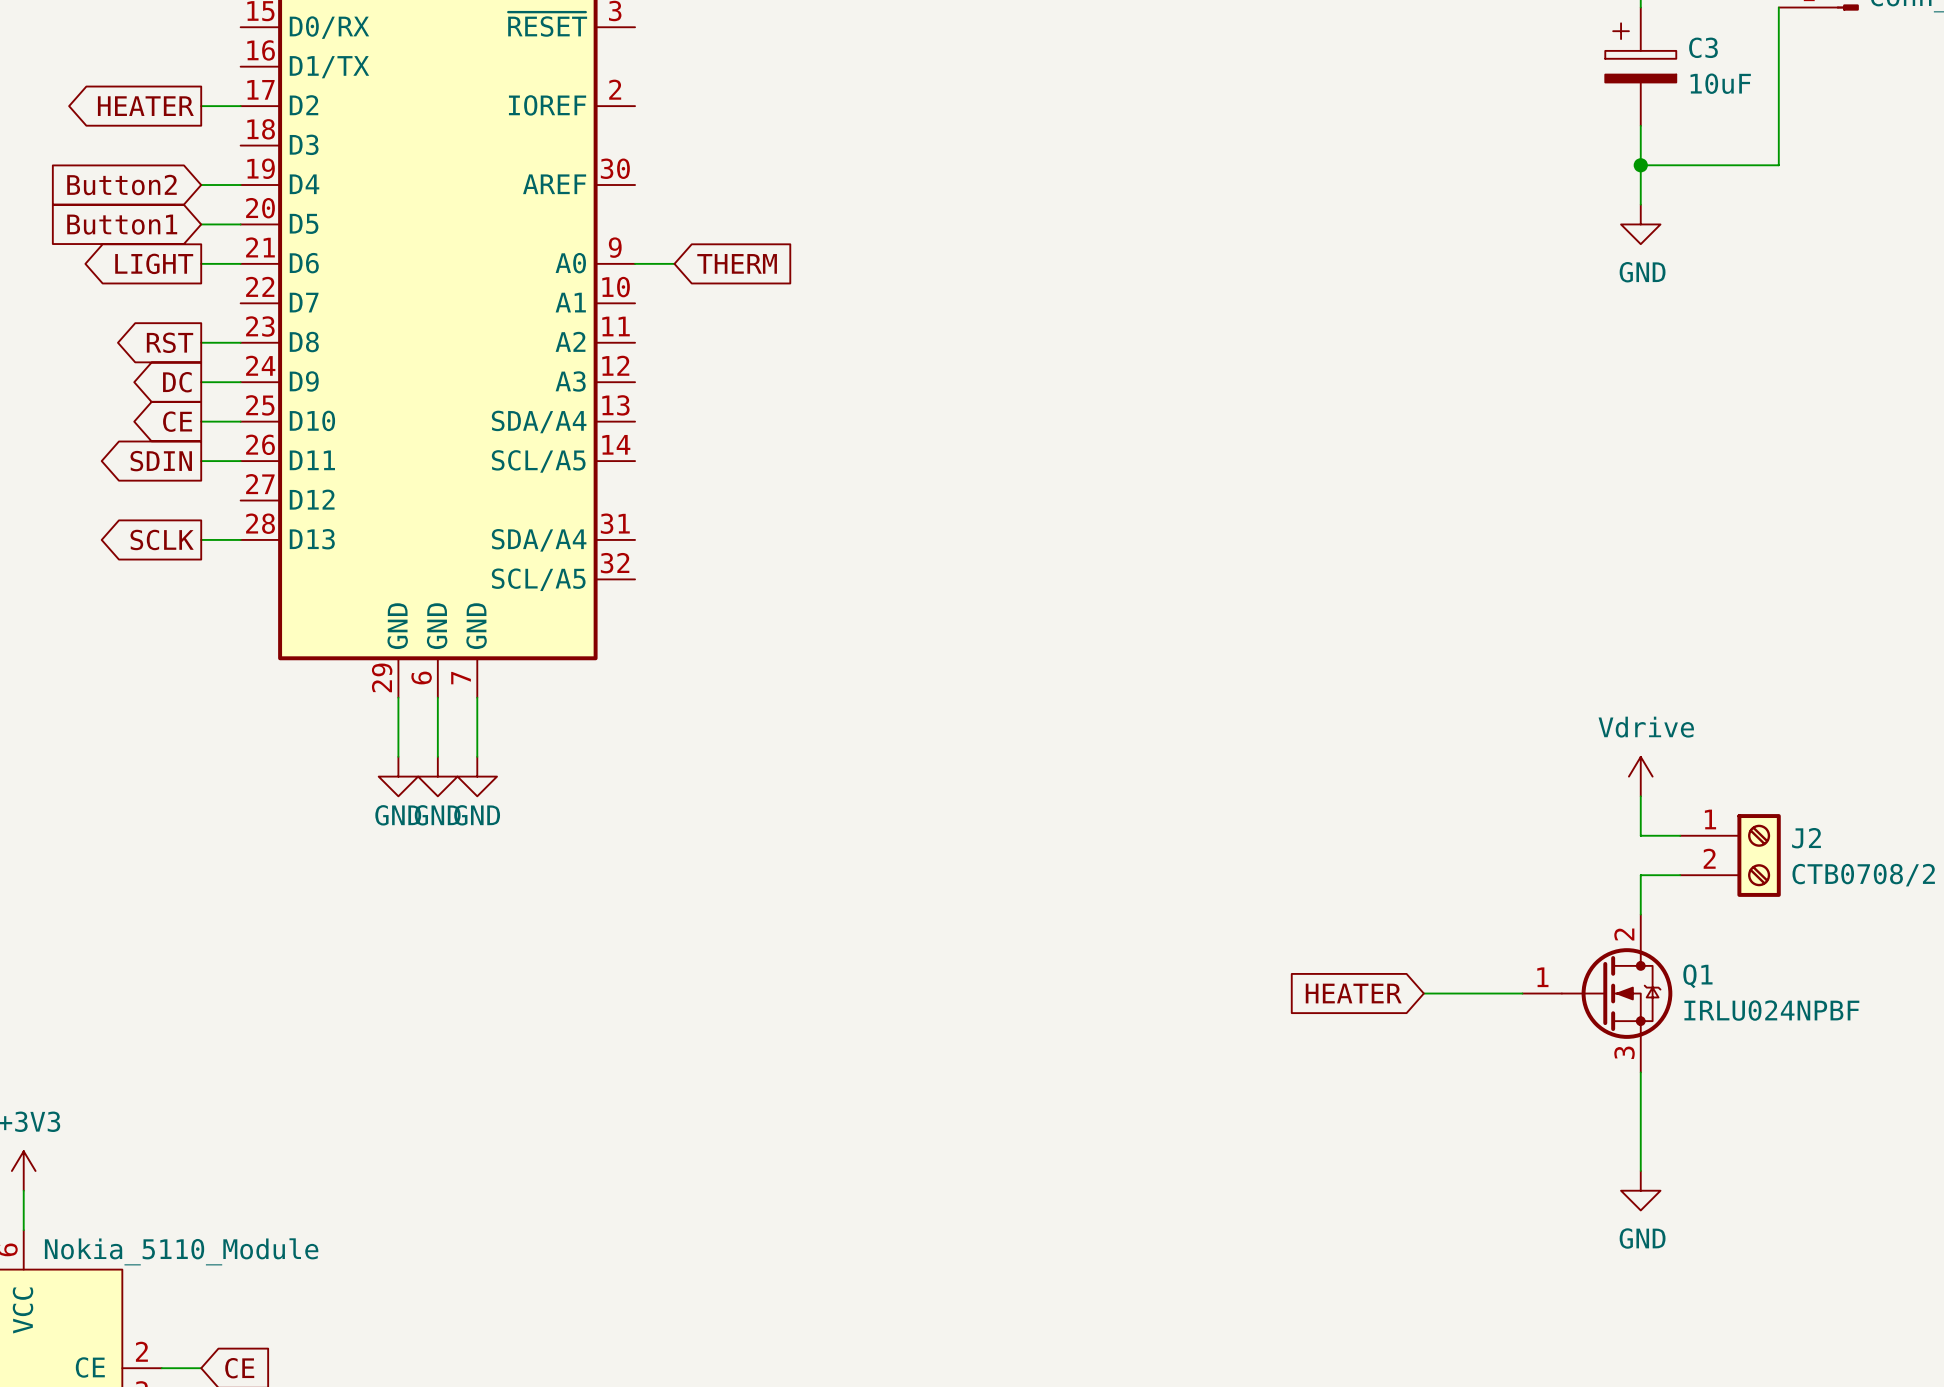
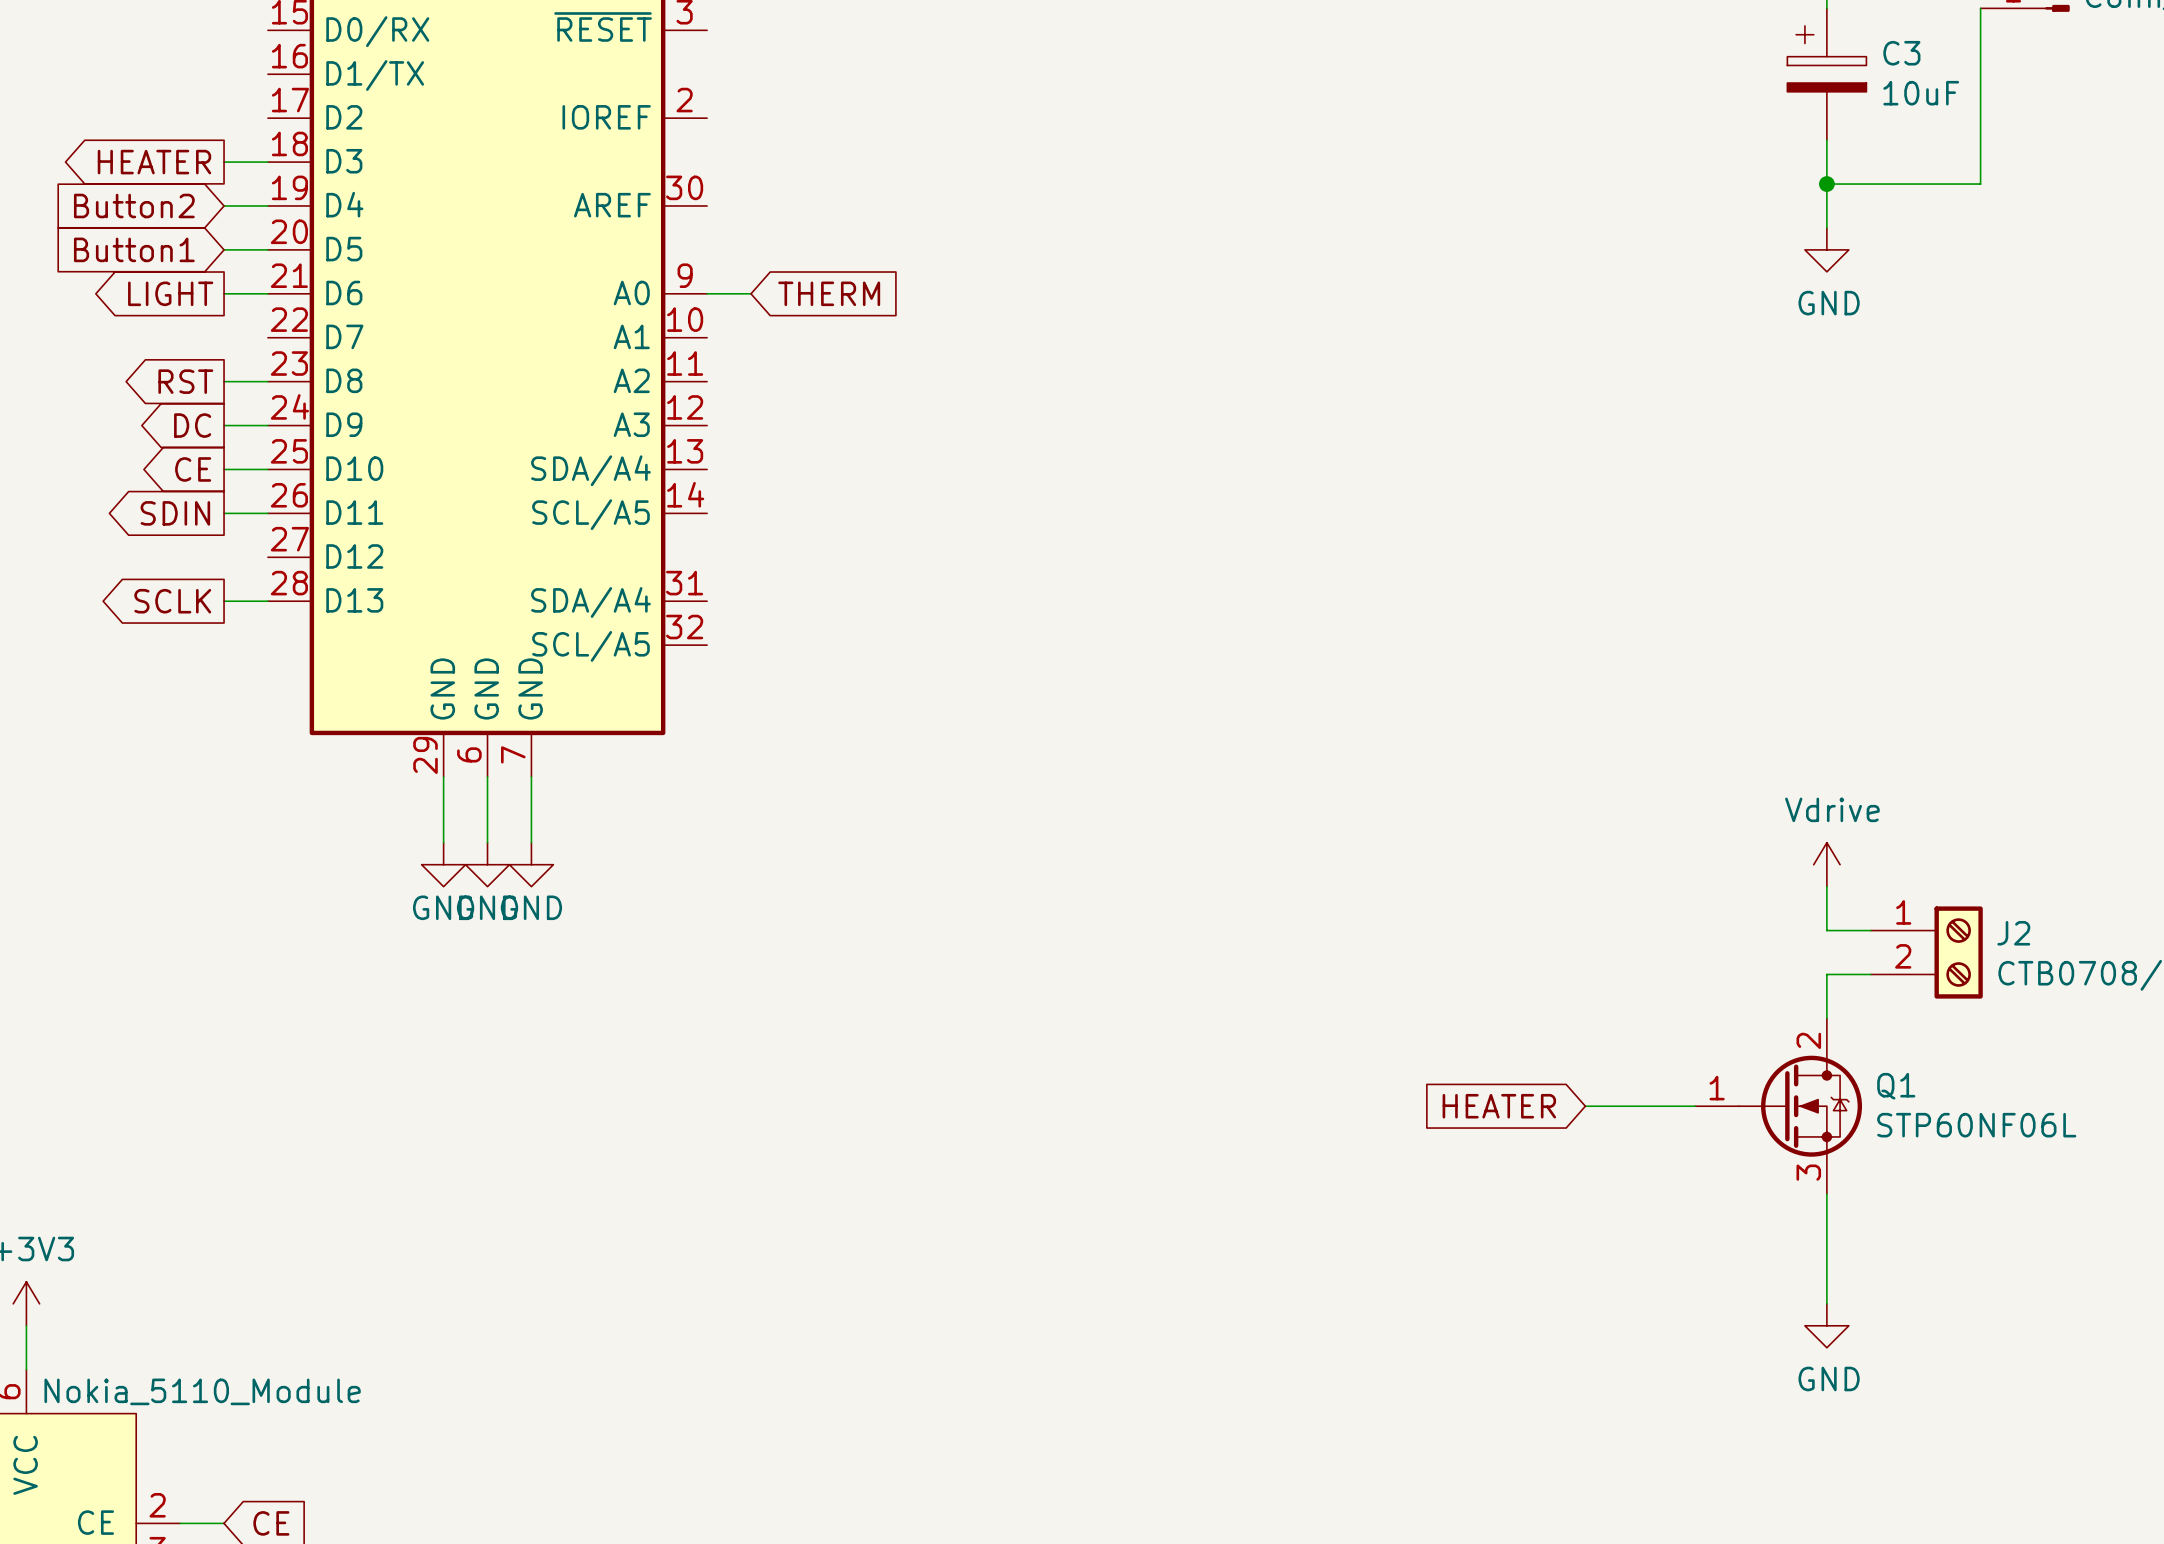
global label position: HEATER (145, 106) -> HEATER (154, 162)
wire: (201, 106) (240, 106) -> (224, 162) (267, 162)
Q1 value: IRLU024NPBF (1771, 1010) -> STP60NF06L (1976, 1125)

